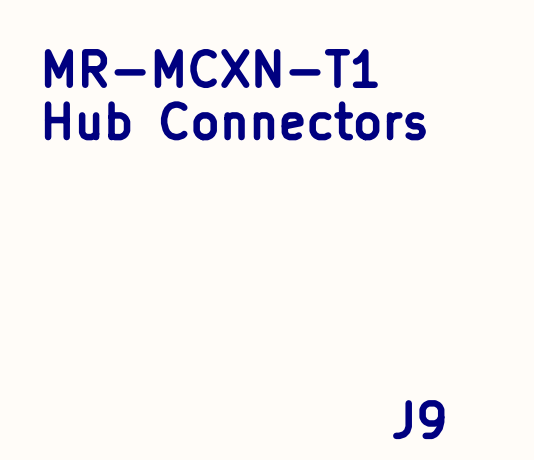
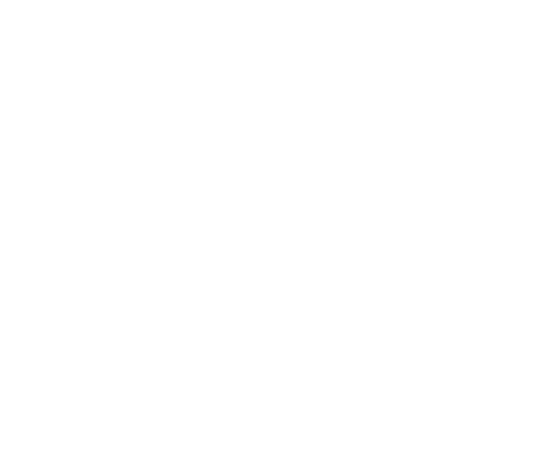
text: MR-MCXN-T1 (211, 68) -> none
text: Hub Connectors (235, 120) -> none
text: J9 (418, 419) -> none

